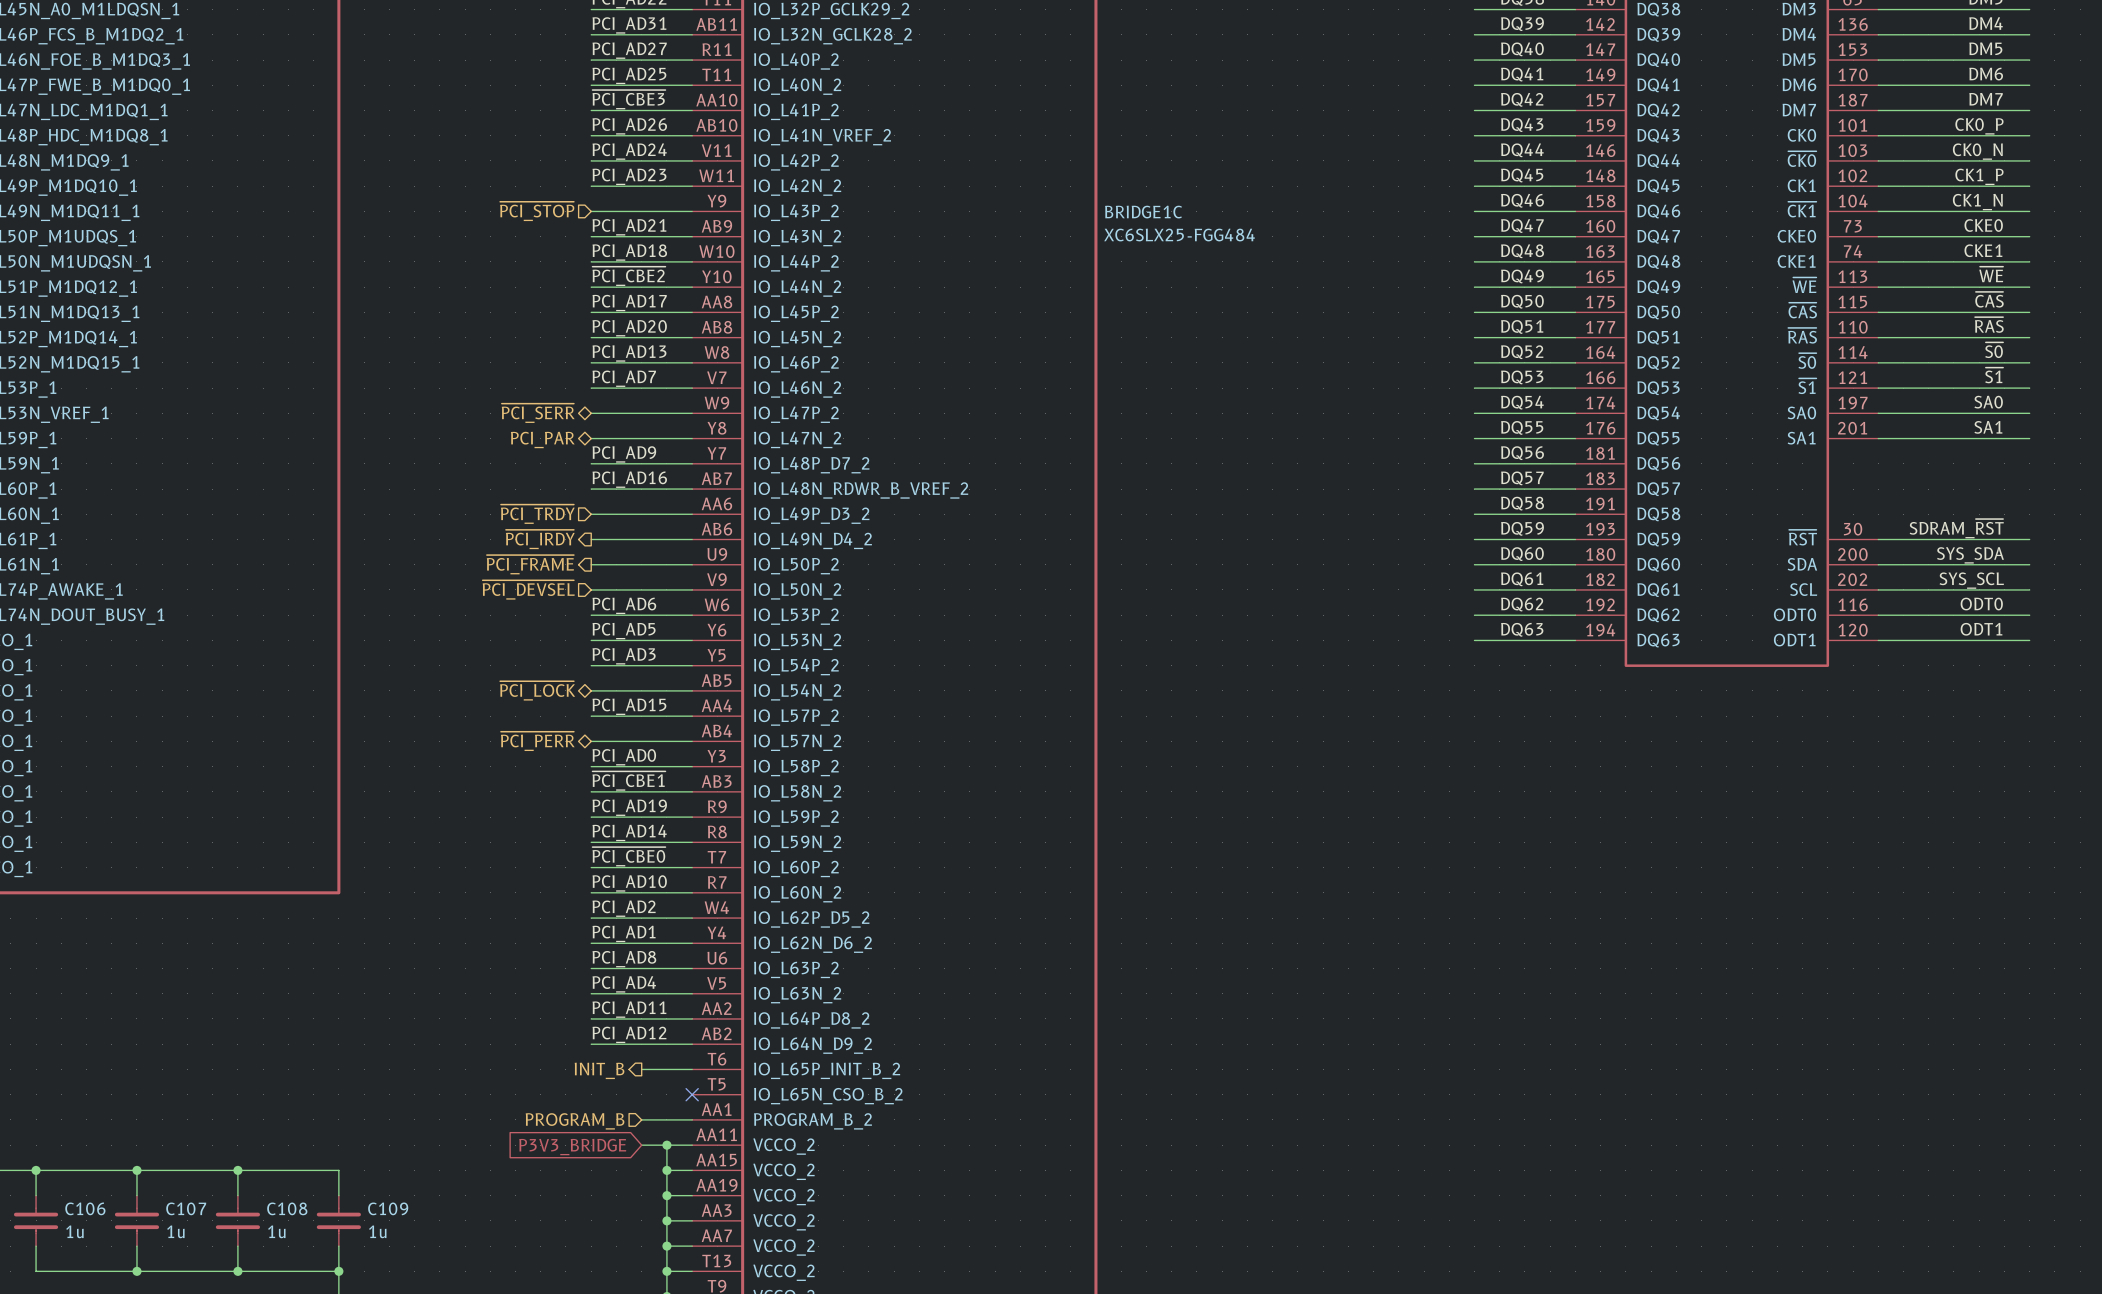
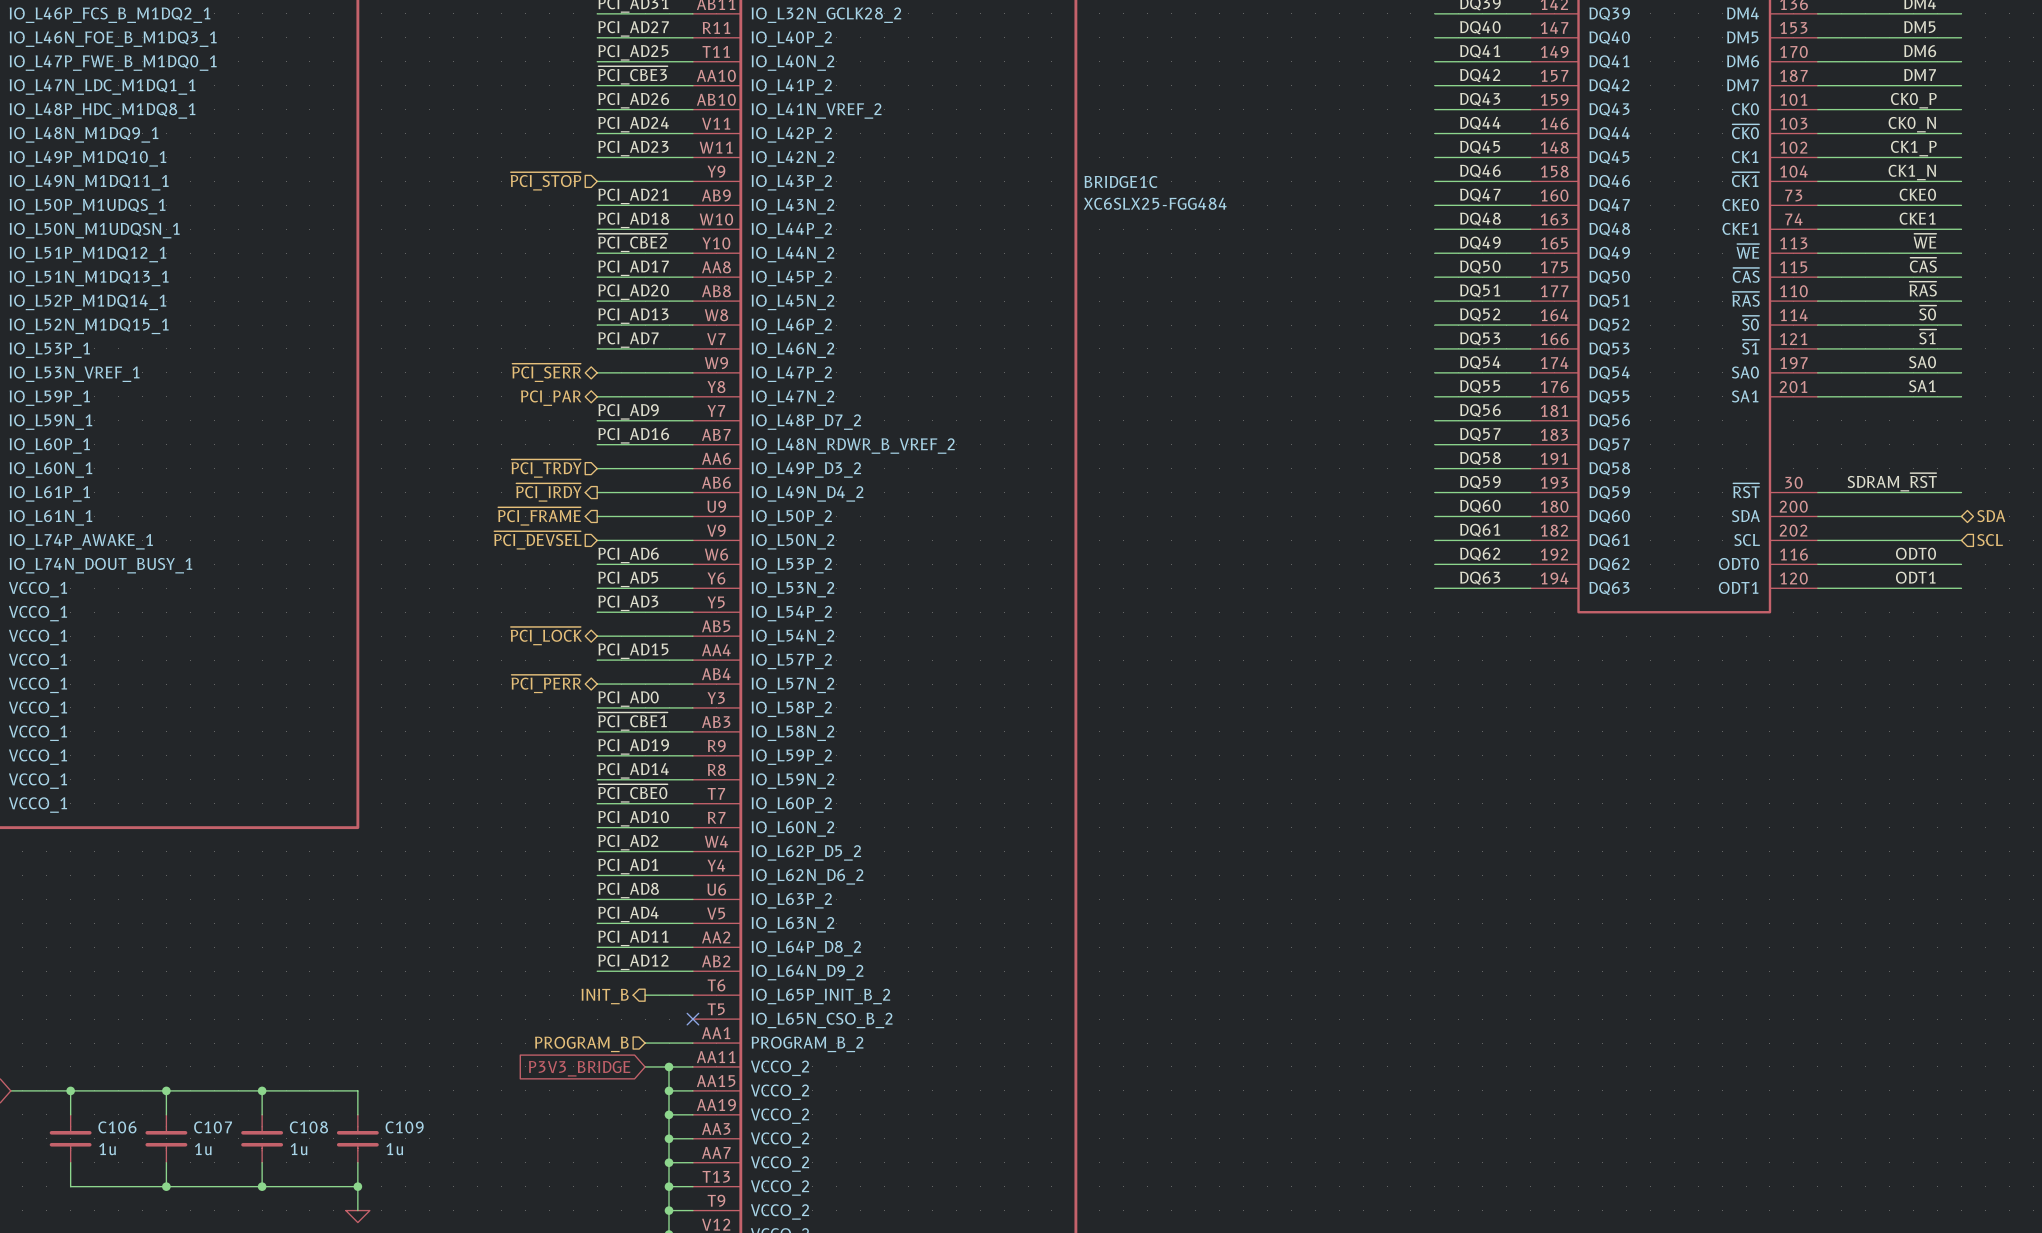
label: SYS_SDA (1970, 555) -> none
hierarchical label: none -> SDA (1991, 516)
label: SYS_SCL (1971, 580) -> none
hierarchical label: none -> SCL (1990, 540)

